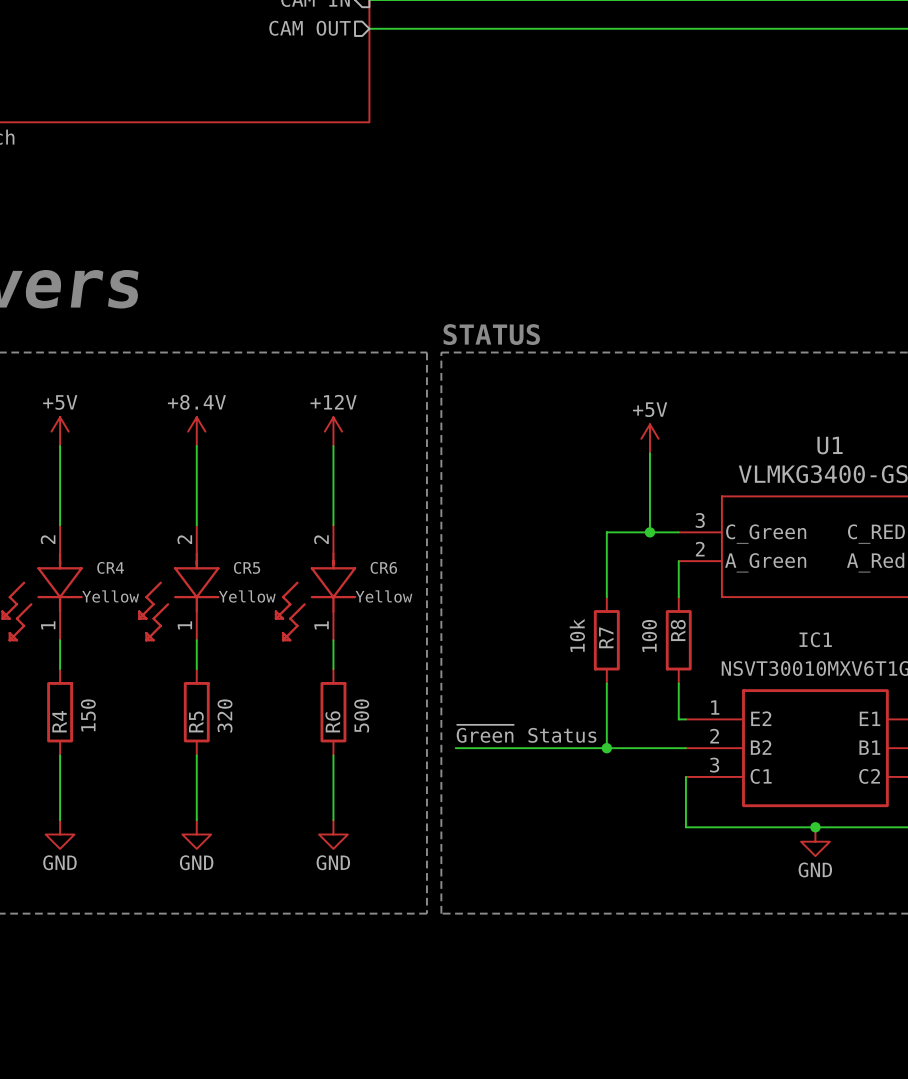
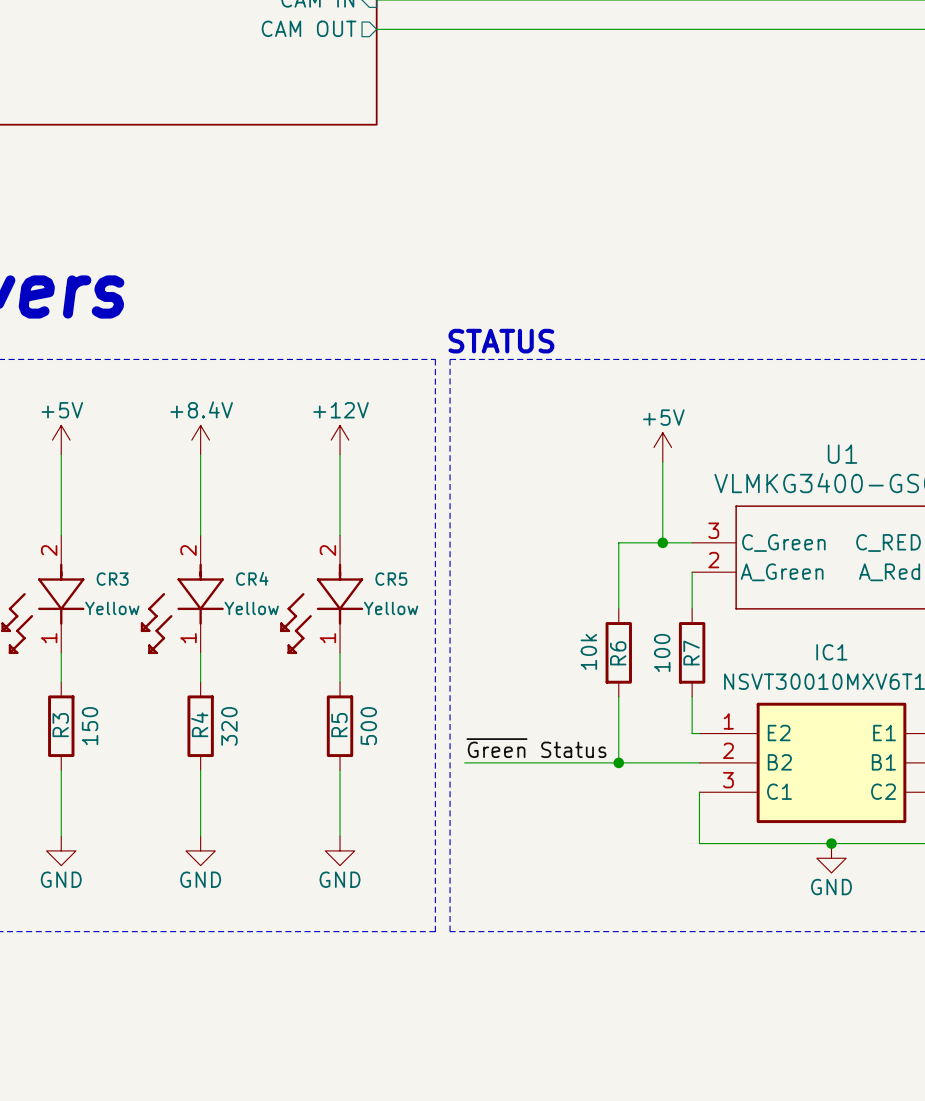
CR4 name: CR4 (110, 567) -> CR3 (112, 579)
CR5 name: CR5 (247, 567) -> CR4 (252, 578)
CR6 name: CR6 (383, 567) -> CR5 (391, 579)
R8 name: R8 (678, 630) -> R7 (691, 652)
R7 name: R7 (606, 637) -> R6 (618, 653)
R4 name: R4 (59, 721) -> R3 (60, 725)
R6 name: R6 (332, 721) -> R5 (339, 725)
R5 name: R5 (196, 722) -> R4 (199, 724)

